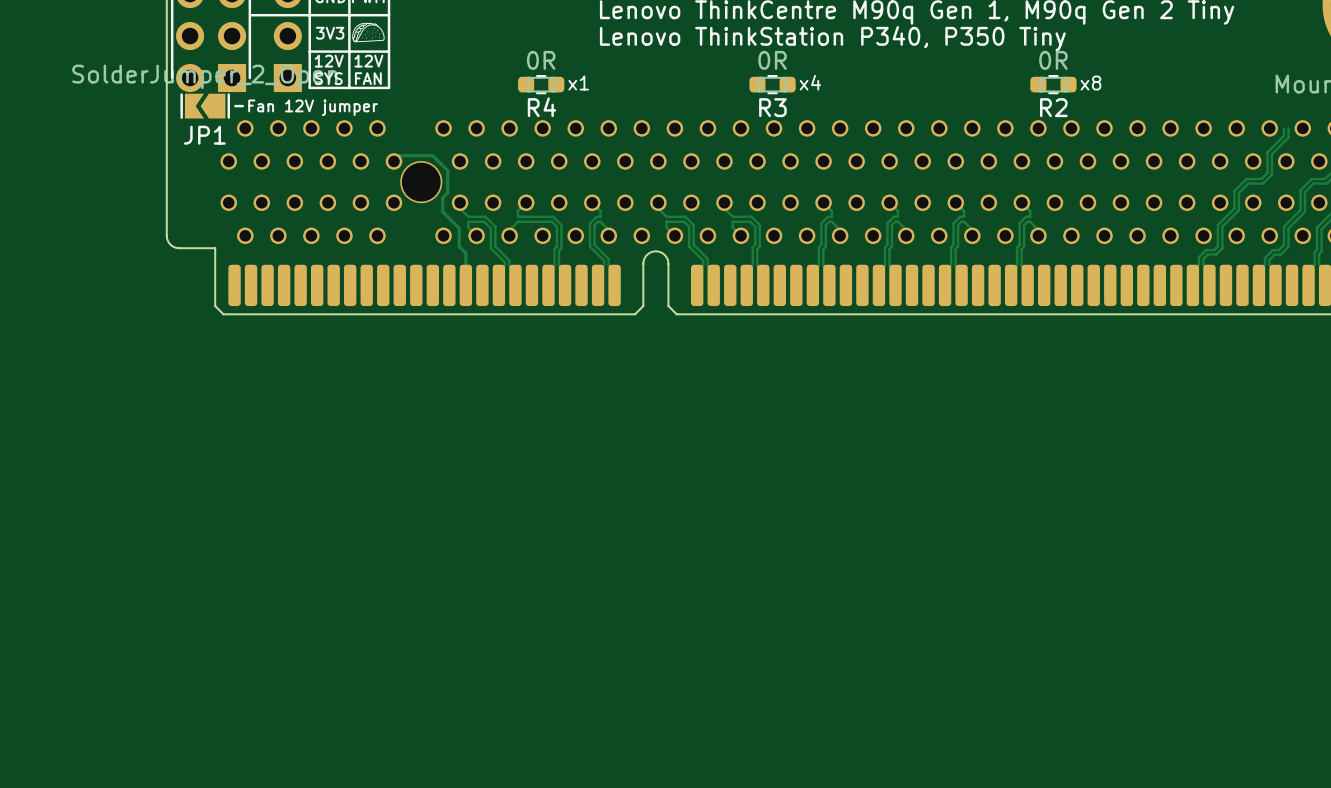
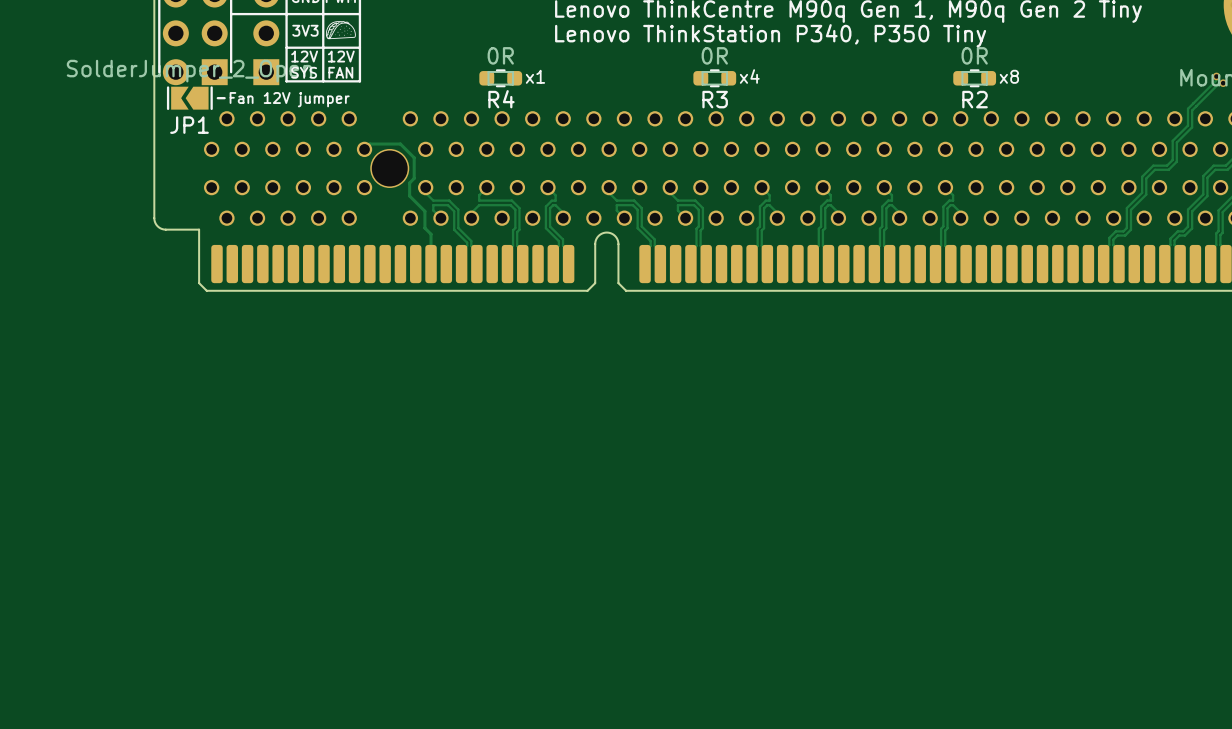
track: none -> (1216, 76) (1216, 80) (1188, 108) (1188, 118)
via: none -> (1216, 76)
track: none -> (1223, 83) (1219, 83) (1192, 110) (1192, 118)
via: none -> (1223, 83)

